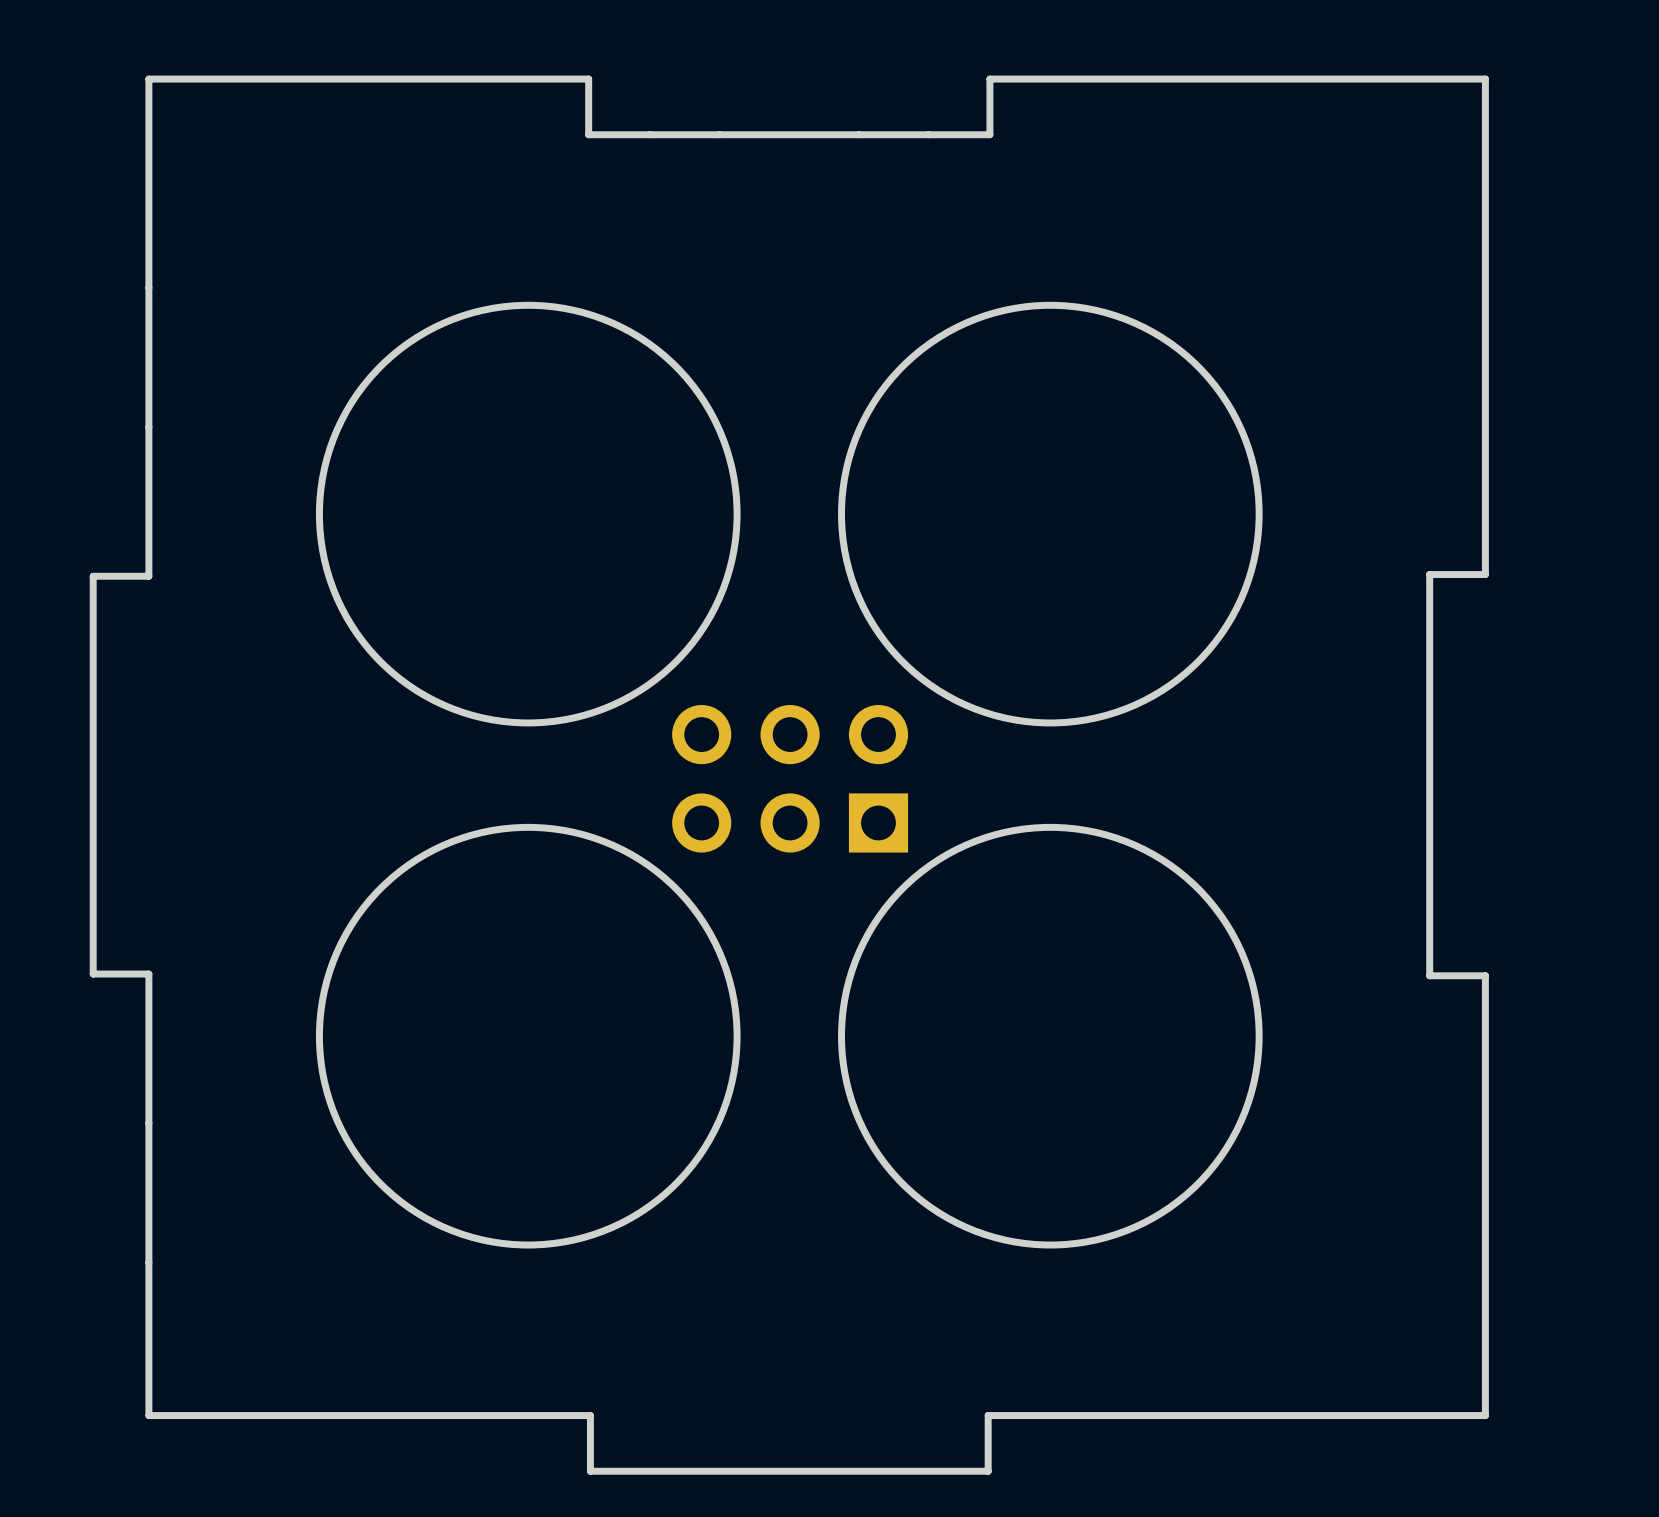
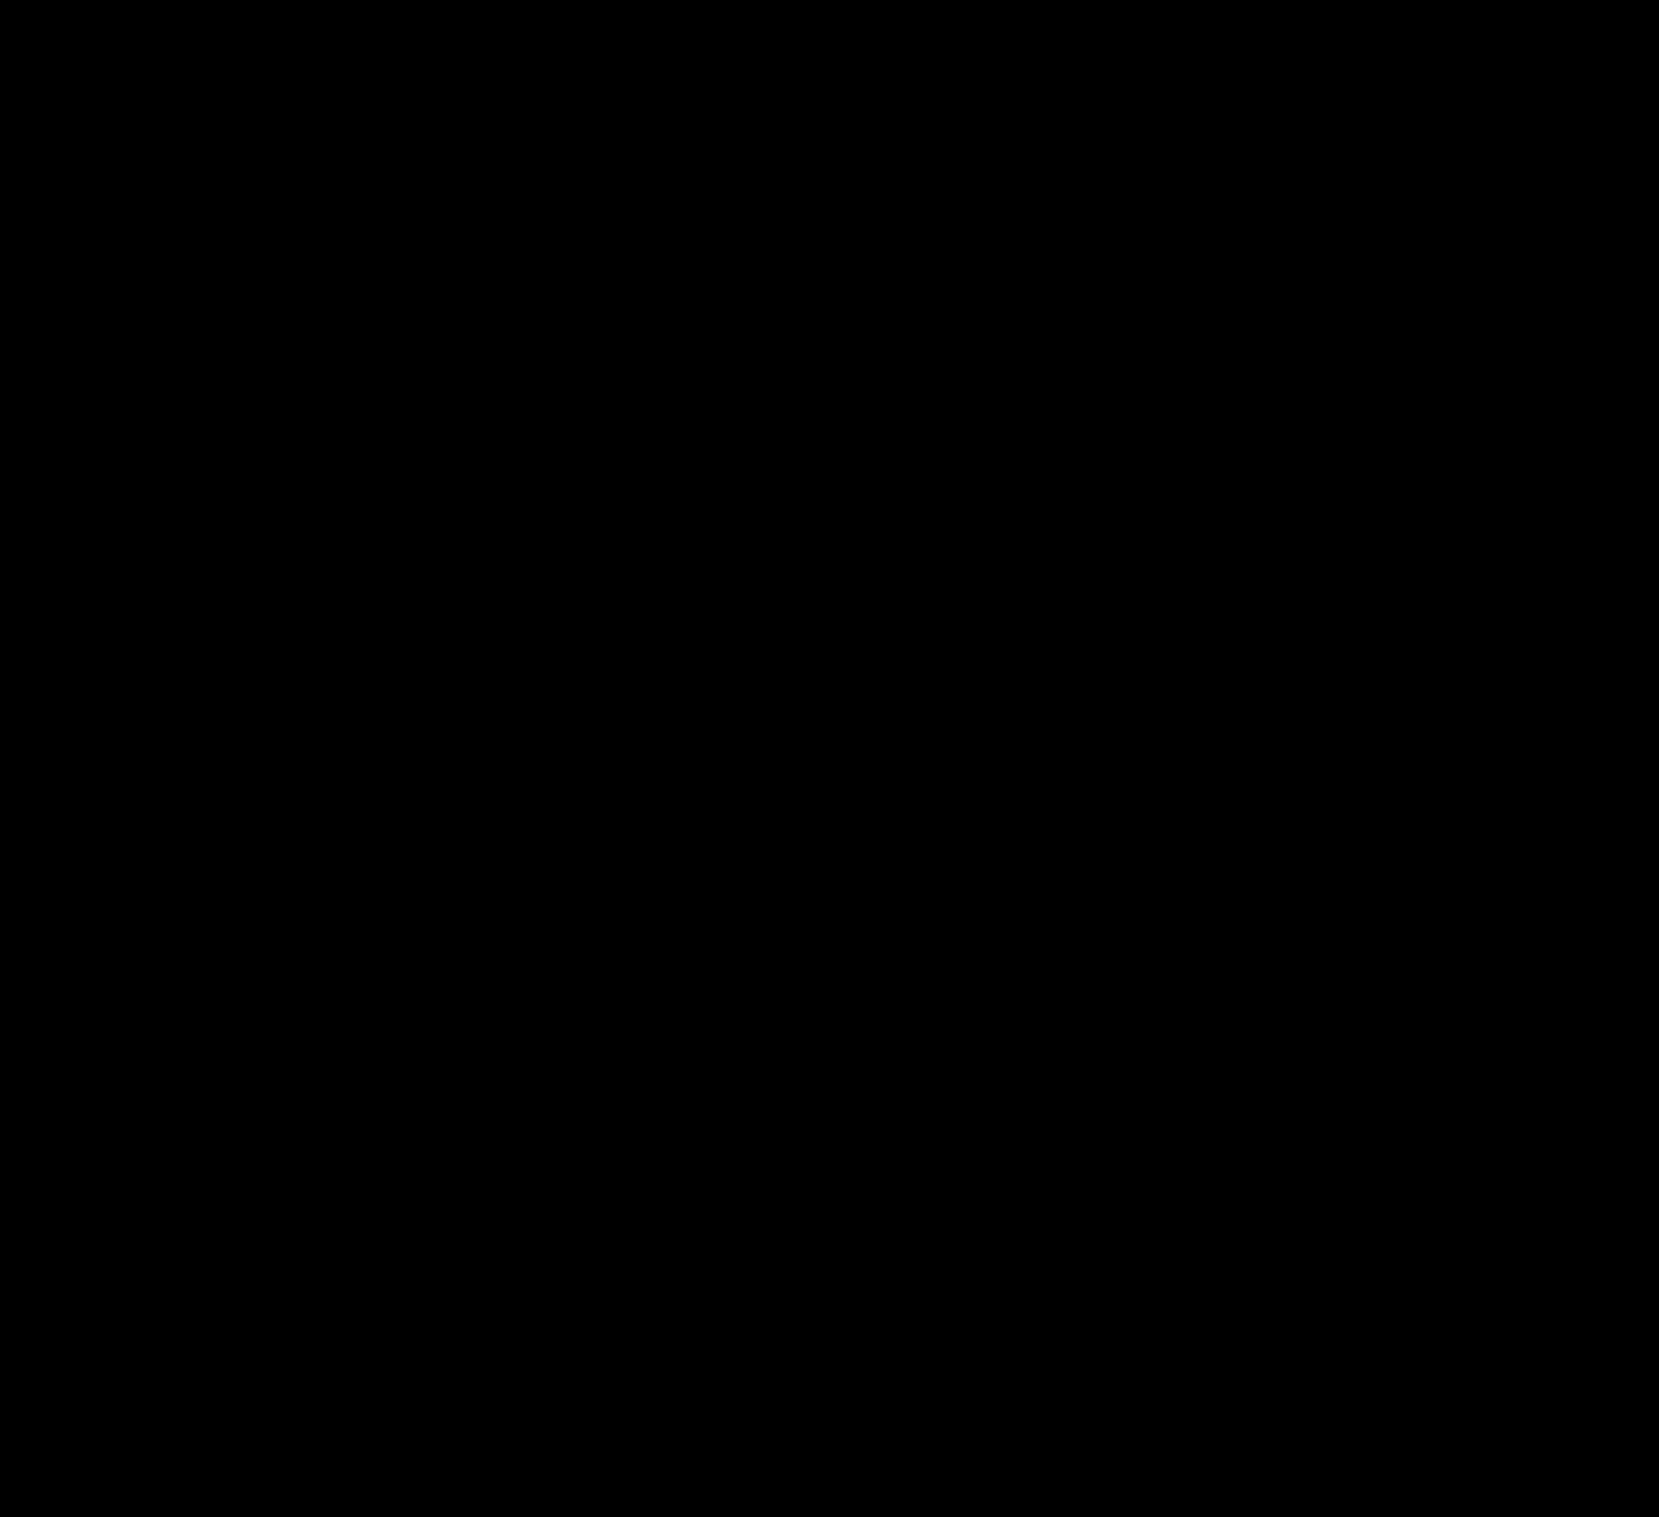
board edge: (1485, 79) (989, 79) (989, 134) (588, 134) (588, 79) (148, 79) (148, 576) (93, 576) (93, 974) (148, 974) (148, 1415) (590, 1415) (590, 1471) (988, 1471) (988, 1415) (1485, 1415) (1485, 975) (1429, 975) (1429, 574) (1485, 574) (1485, 79) -> none
round board edge: [315, 301, 741, 727] -> none
round board edge: [838, 301, 1263, 727] -> none
part: (790, 778) -> none
round board edge: [315, 823, 741, 1249] -> none
round board edge: [838, 823, 1263, 1249] -> none

